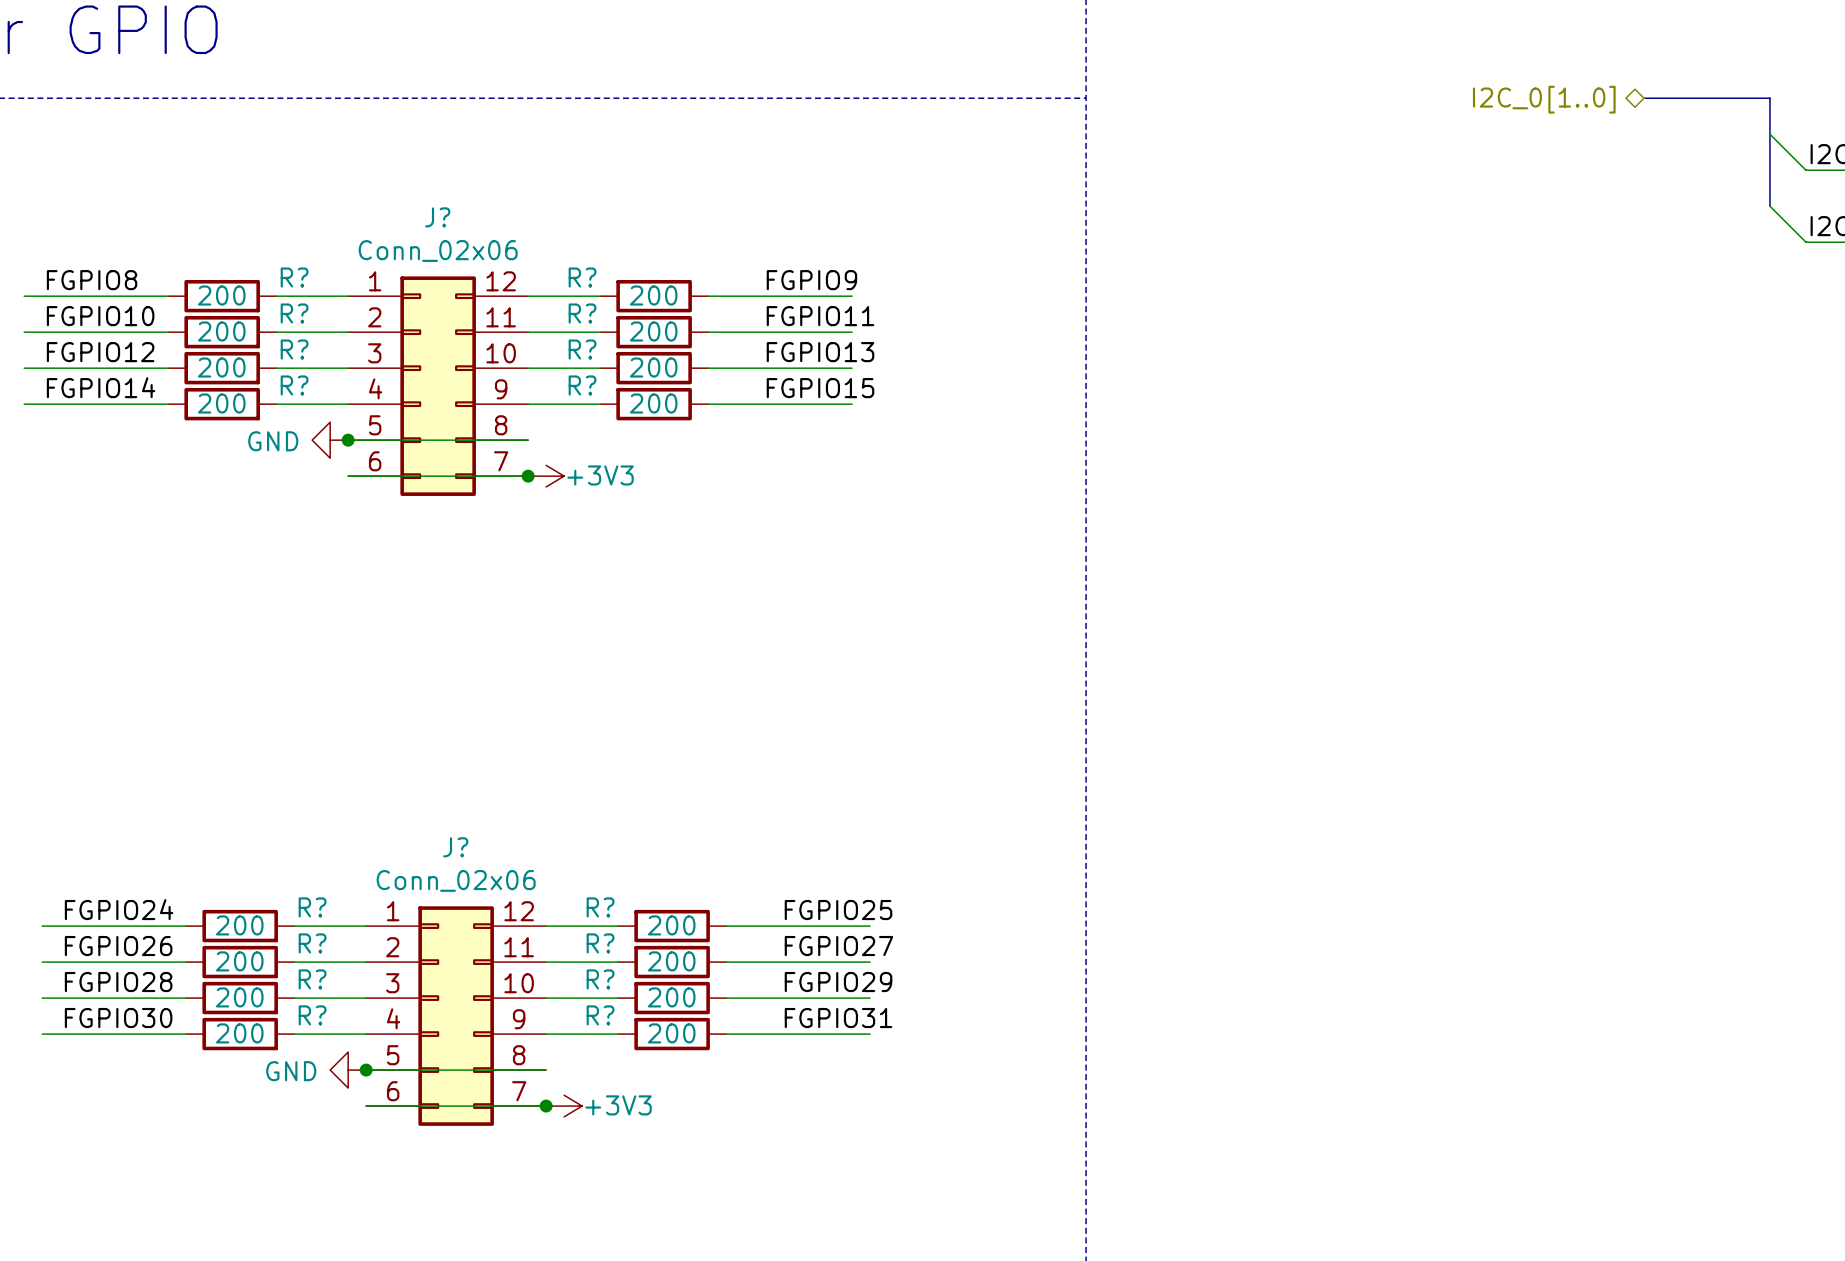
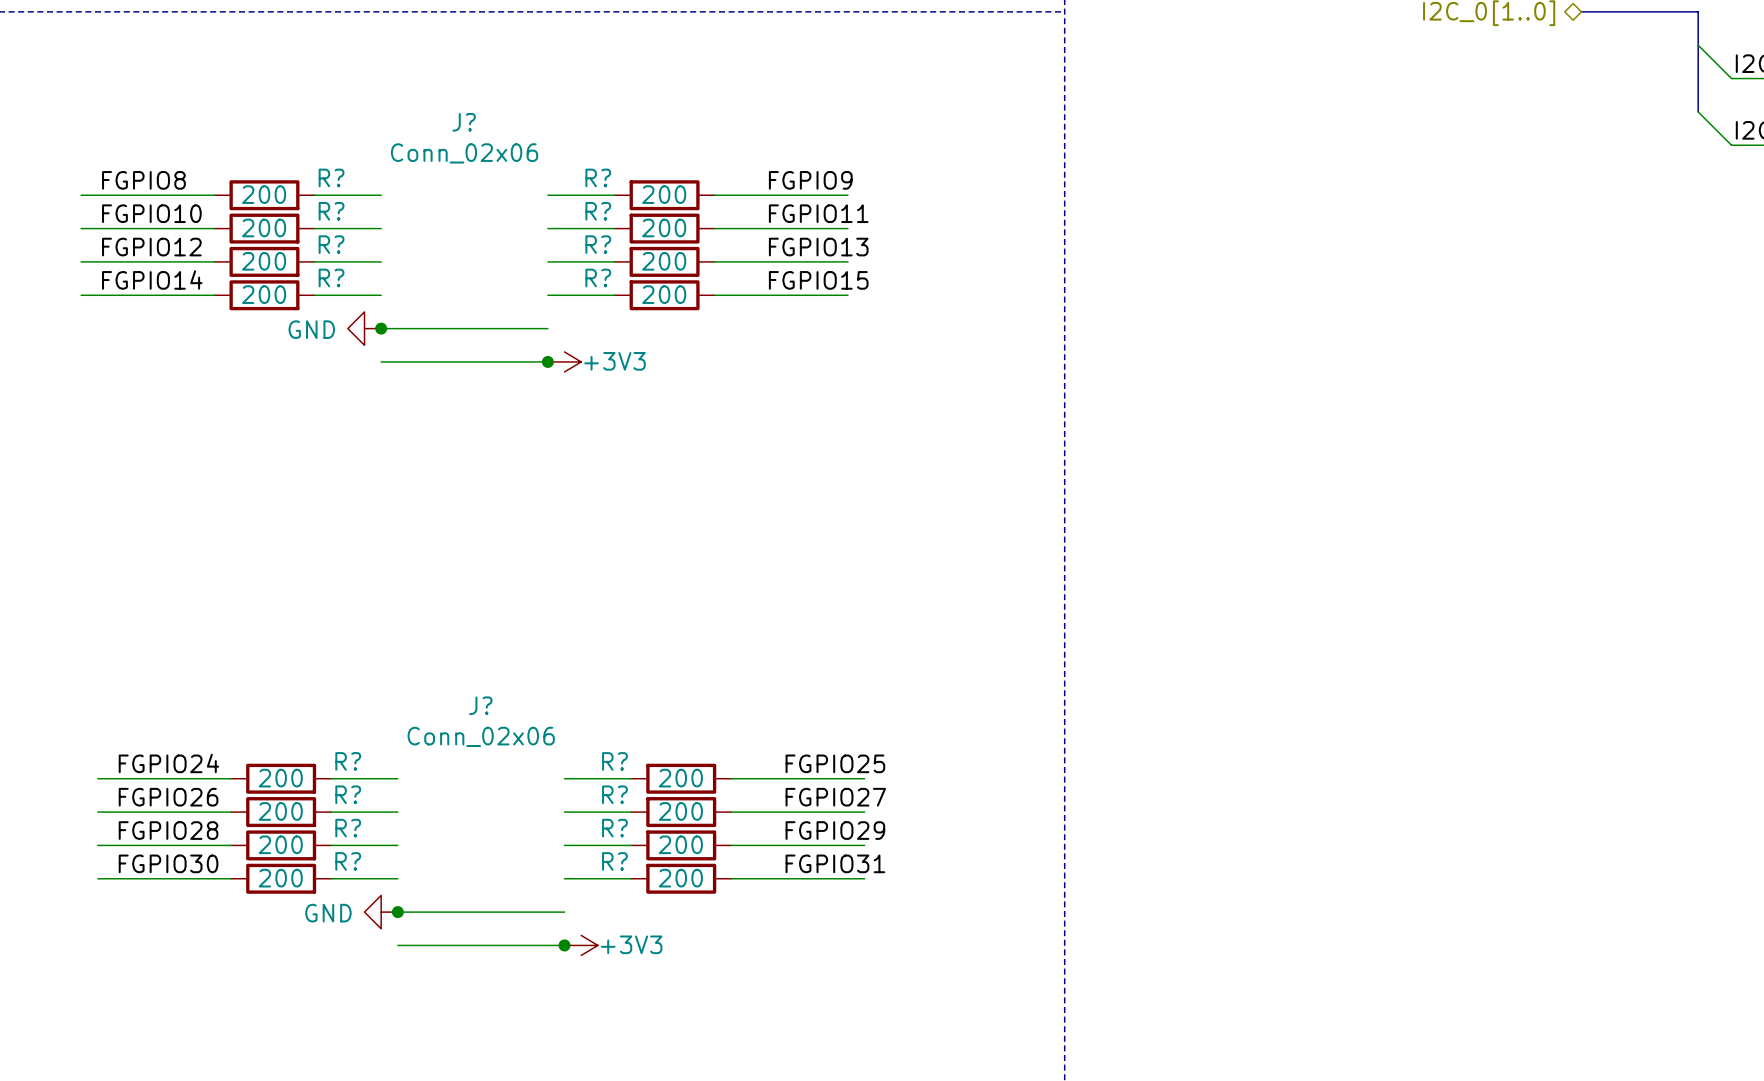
J?: Conn_02x06 (438, 386) -> none
J?: Conn_02x06 (456, 1016) -> none

